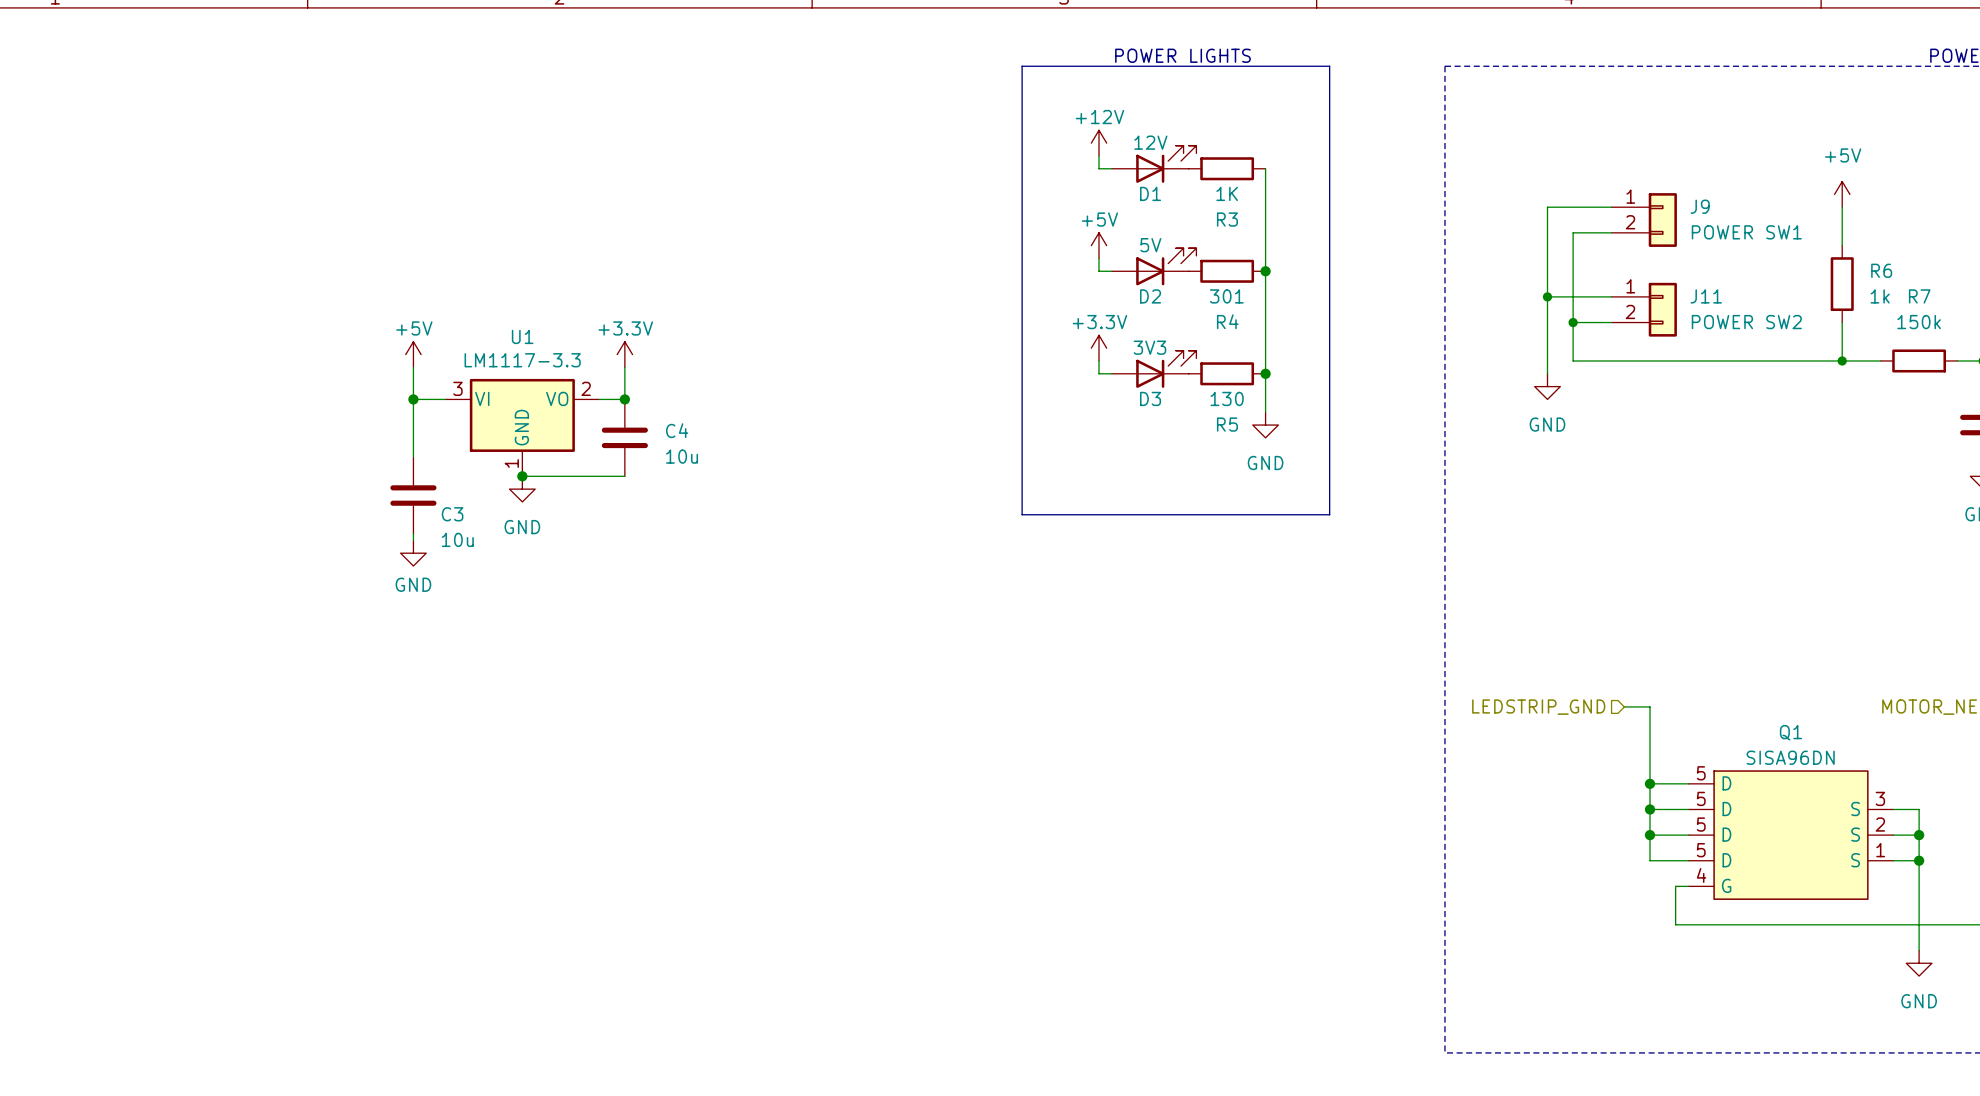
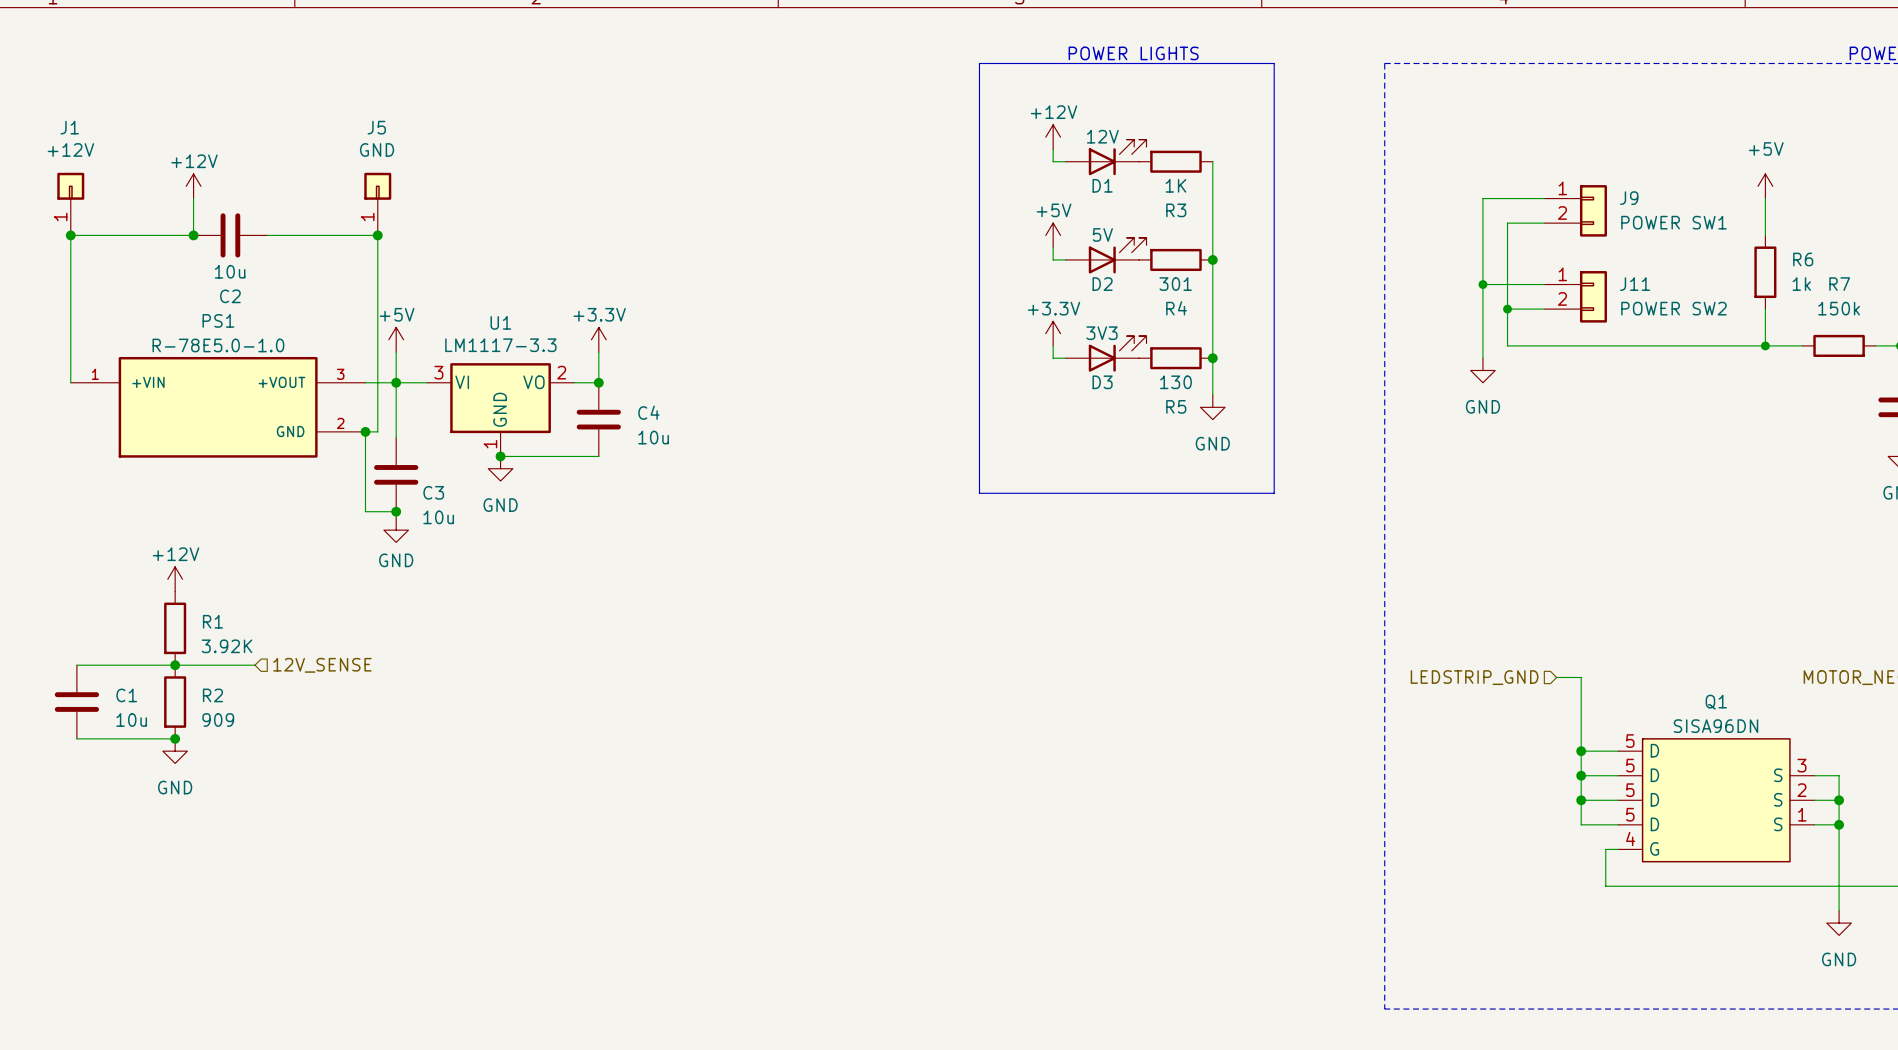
power symbol: none -> +12V (193, 186)
wire: none -> (193, 198) (193, 235) (70, 235) (70, 382)
J1: none -> +12V (70, 204)
J5: none -> GND (377, 204)
junction: none -> (70, 235)
junction: none -> (193, 235)
C2: none -> 10u (230, 235)
wire: none -> (267, 235) (377, 235) (377, 431) (365, 431) (365, 511) (396, 511)
junction: none -> (377, 235)
wire: none -> (365, 382) (396, 382)
PS1: none -> R-78E5.0-1.0 (218, 407)
junction: none -> (365, 431)
junction: none -> (396, 511)
power symbol: none -> +12V (175, 579)
R1: none -> 3.92K (175, 628)
wire: none -> (76, 665) (254, 665)
junction: none -> (175, 665)
hierarchical label: none -> 12V_SENSE (322, 665)
C1: none -> 10u (76, 702)
R2: none -> 909 (175, 702)
wire: none -> (76, 738) (175, 738)
junction: none -> (175, 738)
power symbol: none -> GND (175, 751)

